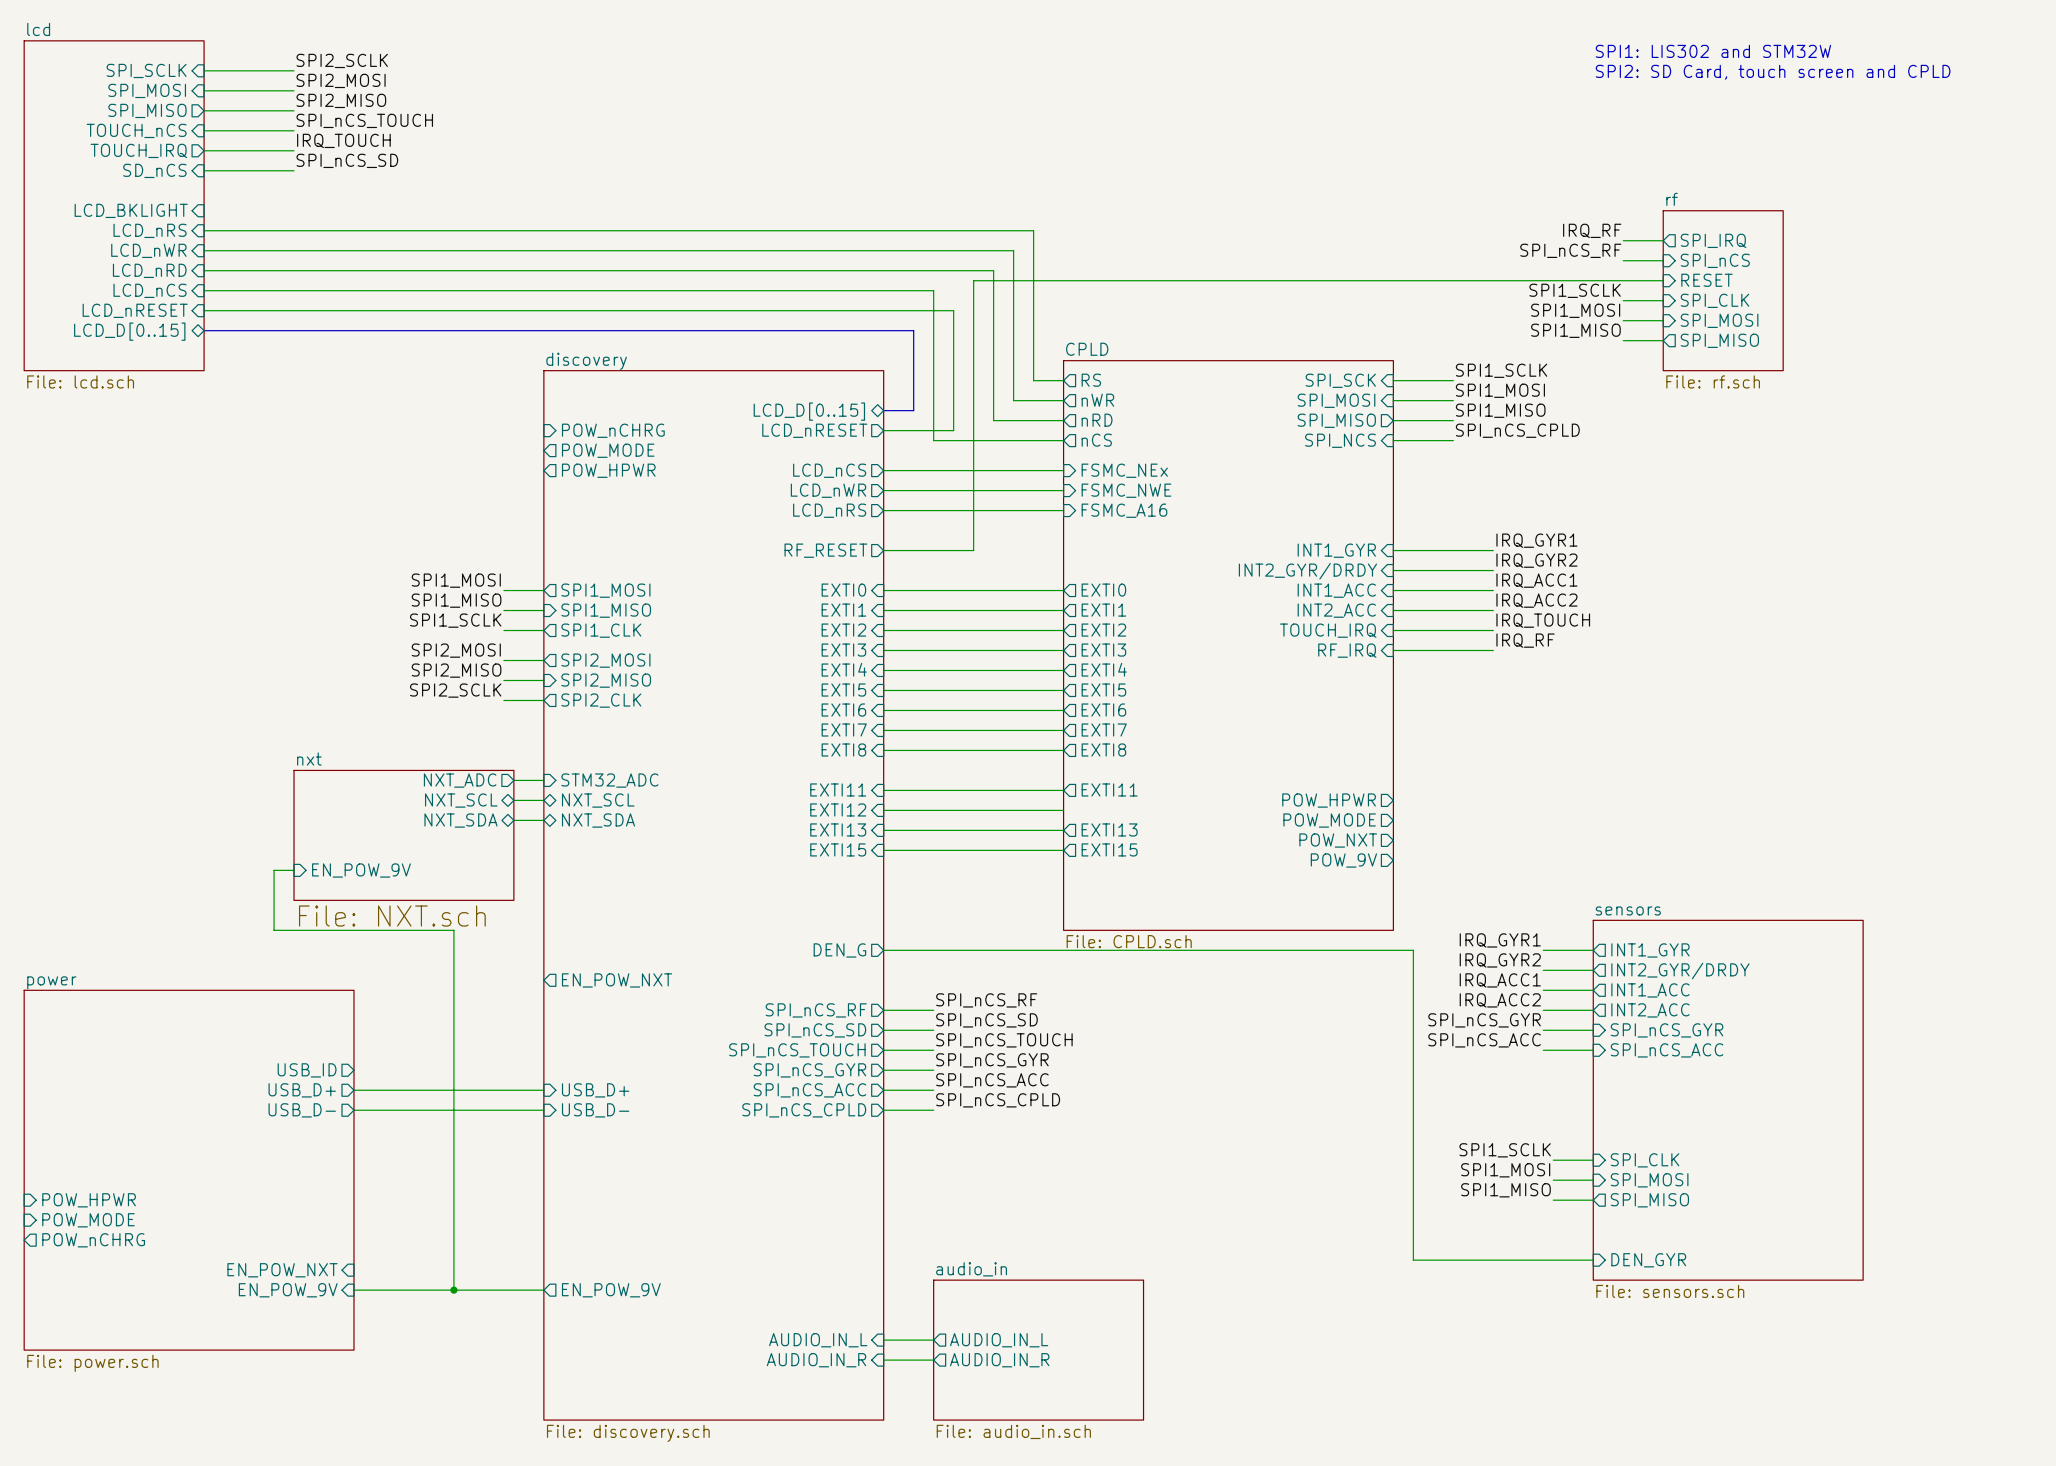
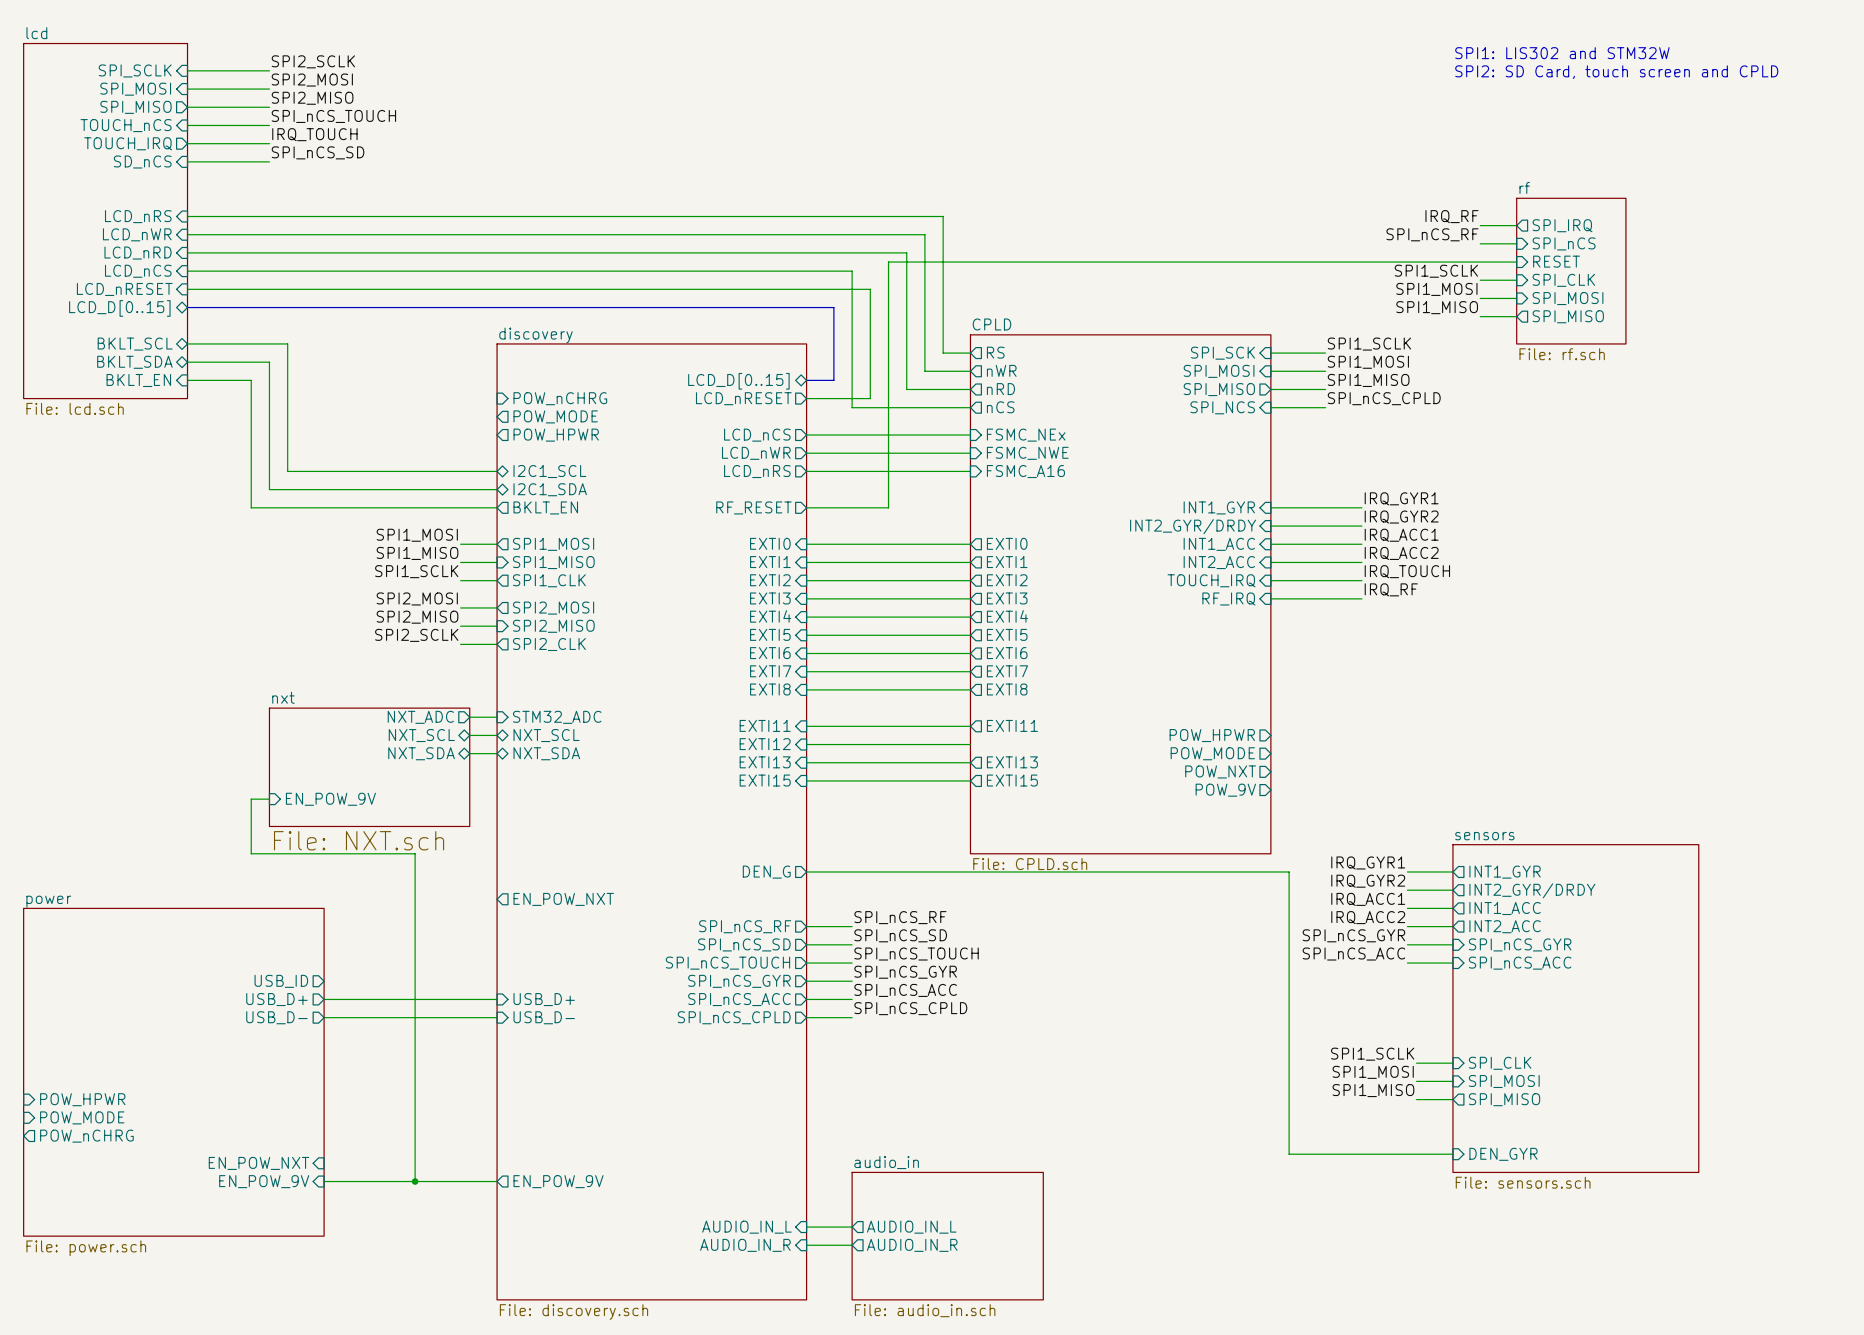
sheet lcd: File: lcd.sch (114, 205) -> none
sheet pin: LCD_BKLIGHT (131, 210) -> none
sheet lcd: none -> File: lcd.sch (105, 221)
sheet pin: none -> BKLT_SCL (135, 344)
wire: none -> (187, 343) (287, 343) (287, 471) (497, 471)
sheet pin: none -> BKLT_SDA (134, 362)
wire: none -> (187, 362) (269, 362) (269, 489) (497, 489)
sheet pin: none -> BKLT_EN (138, 380)
wire: none -> (187, 380) (251, 380) (251, 507) (497, 507)
sheet pin: none -> I2C1_SCL (549, 471)
sheet pin: none -> I2C1_SDA (550, 489)
sheet pin: none -> BKLT_EN (545, 507)

